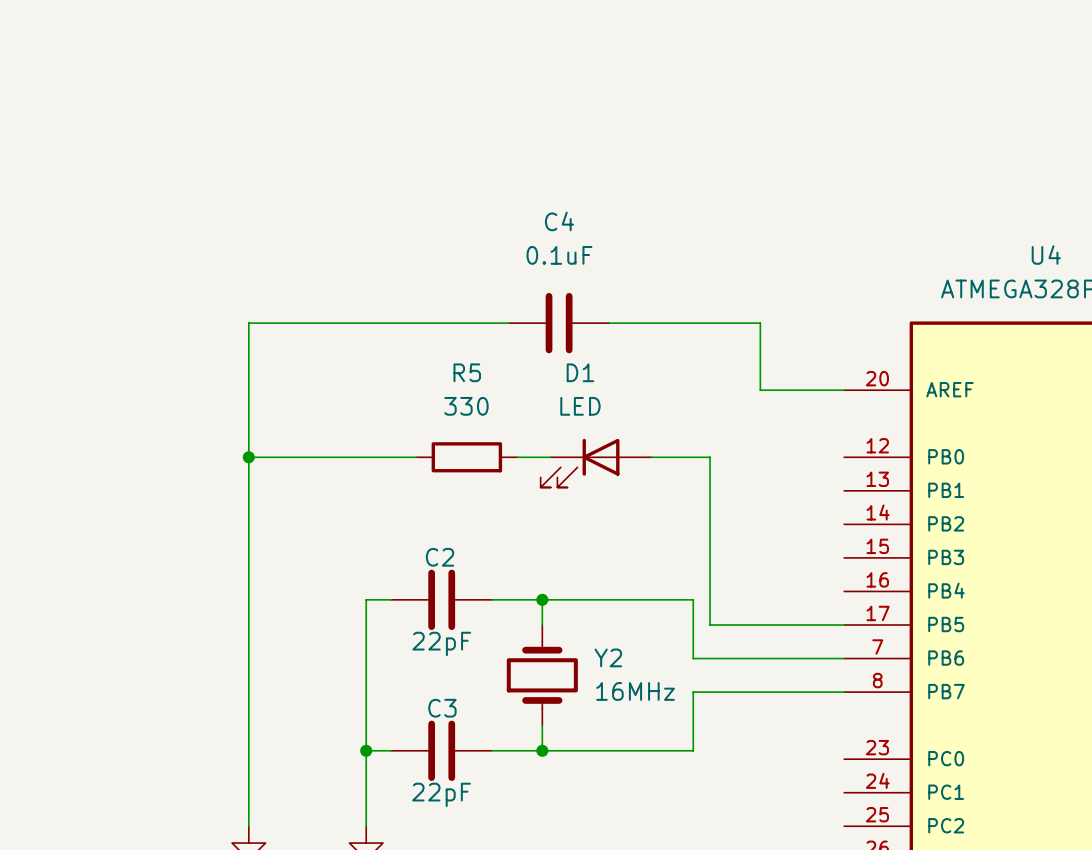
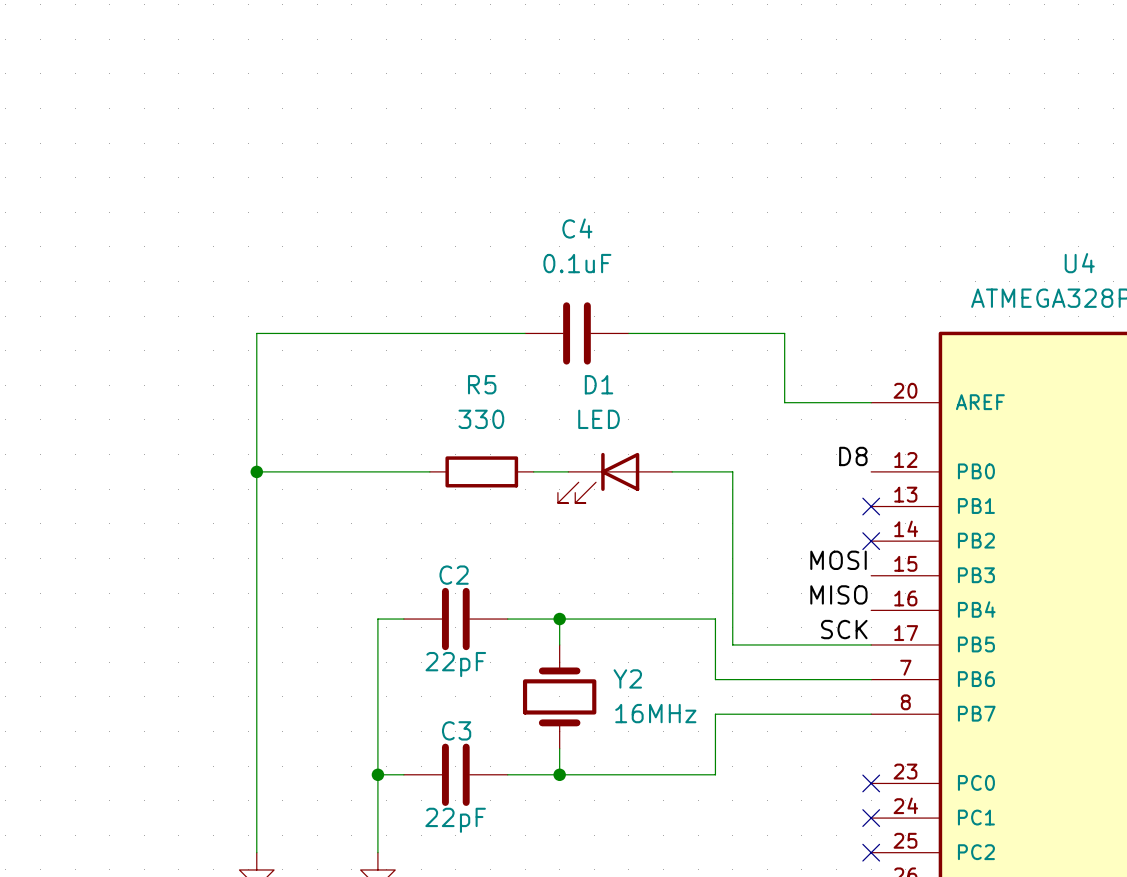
label: none -> D8 (853, 456)
no-connect mark: none -> (871, 506)
no-connect mark: none -> (871, 541)
label: none -> MOSI (838, 560)
label: none -> MISO (838, 594)
label: none -> SCK (844, 629)
no-connect mark: none -> (871, 783)
no-connect mark: none -> (871, 818)
no-connect mark: none -> (871, 852)

